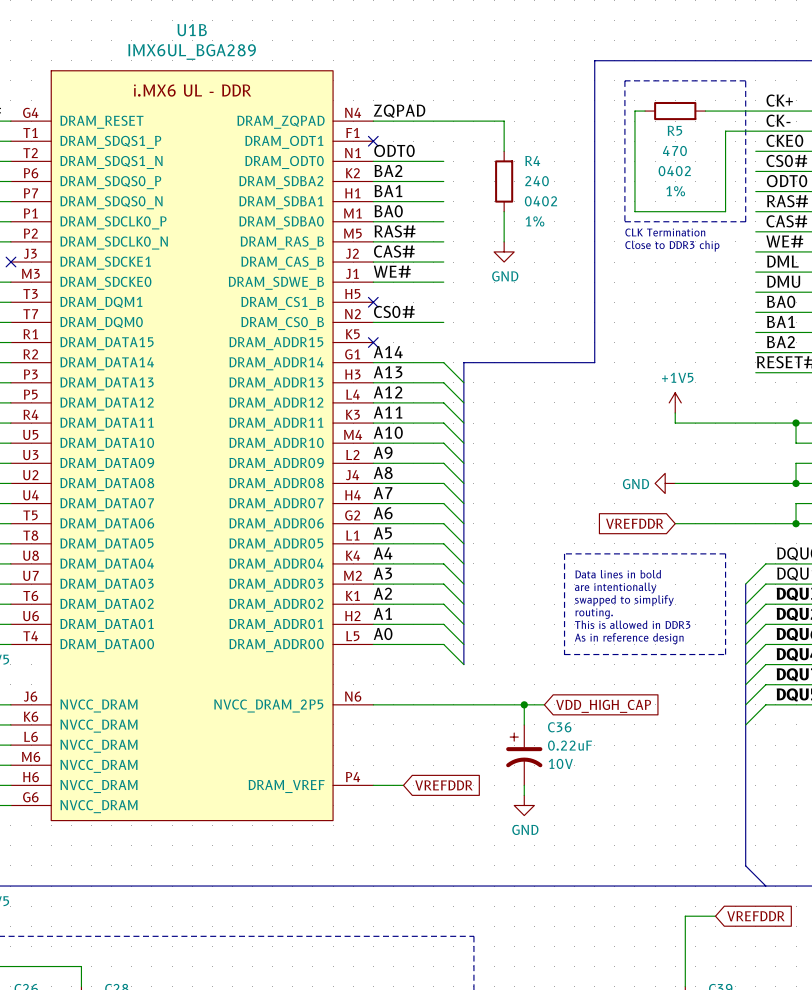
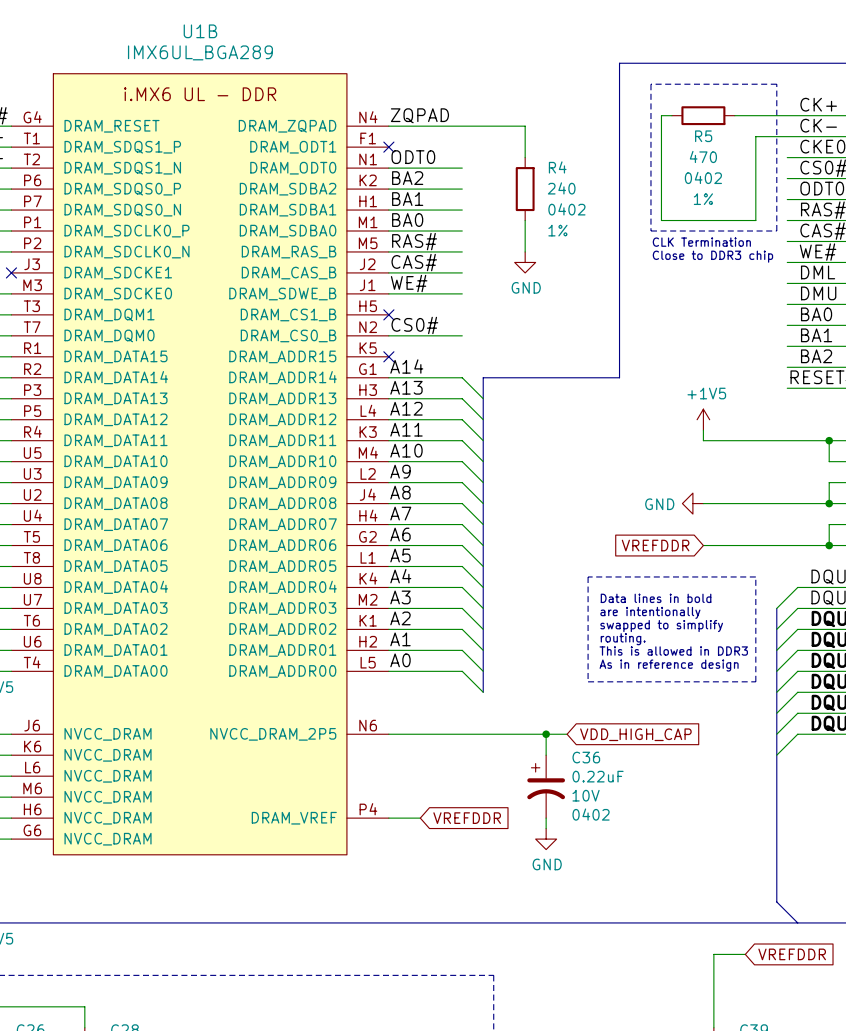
C36 text: none -> 0402 (591, 814)

